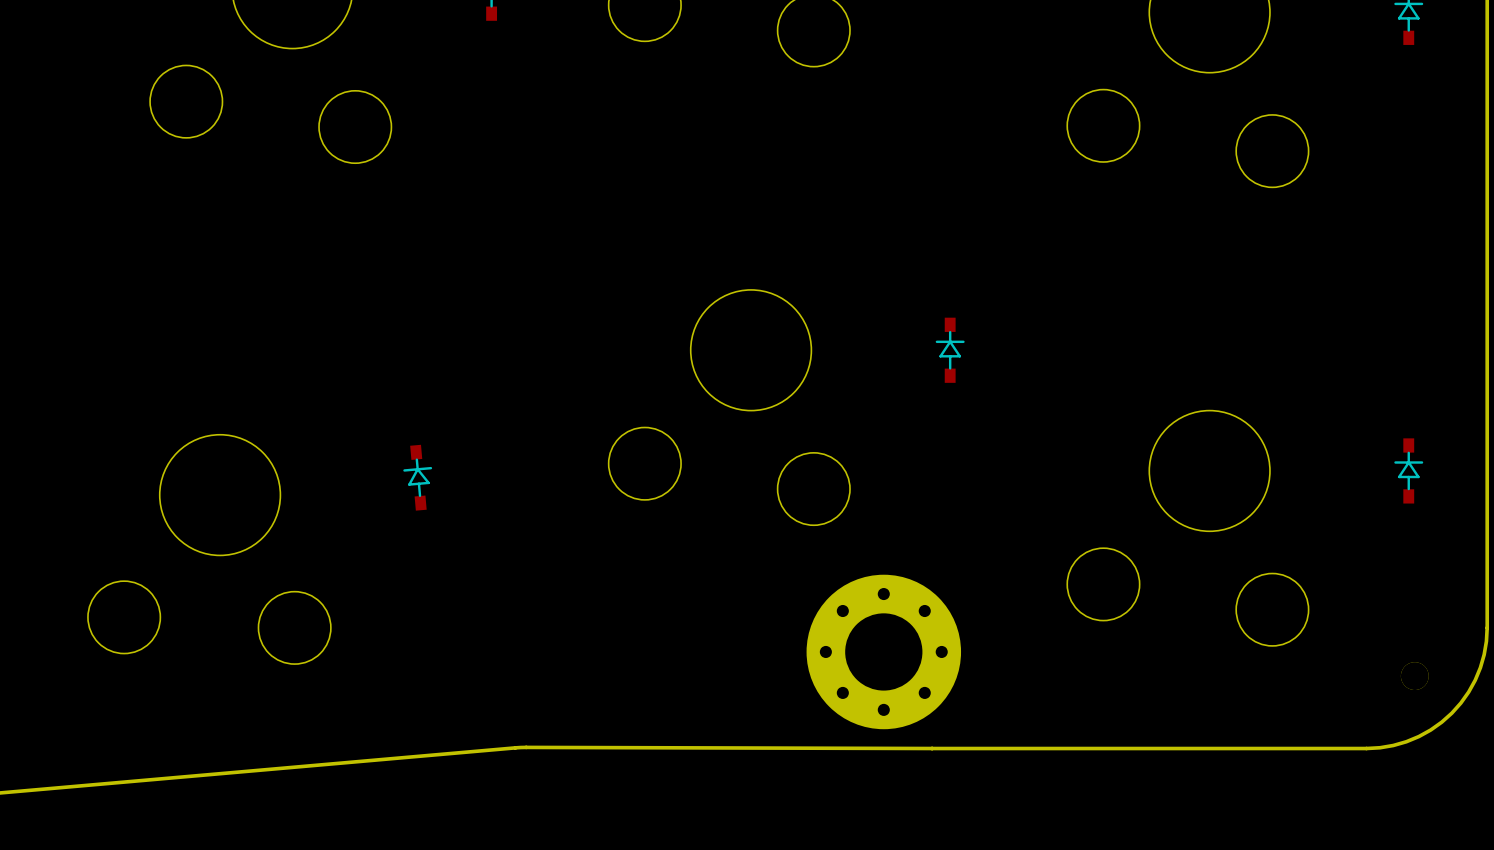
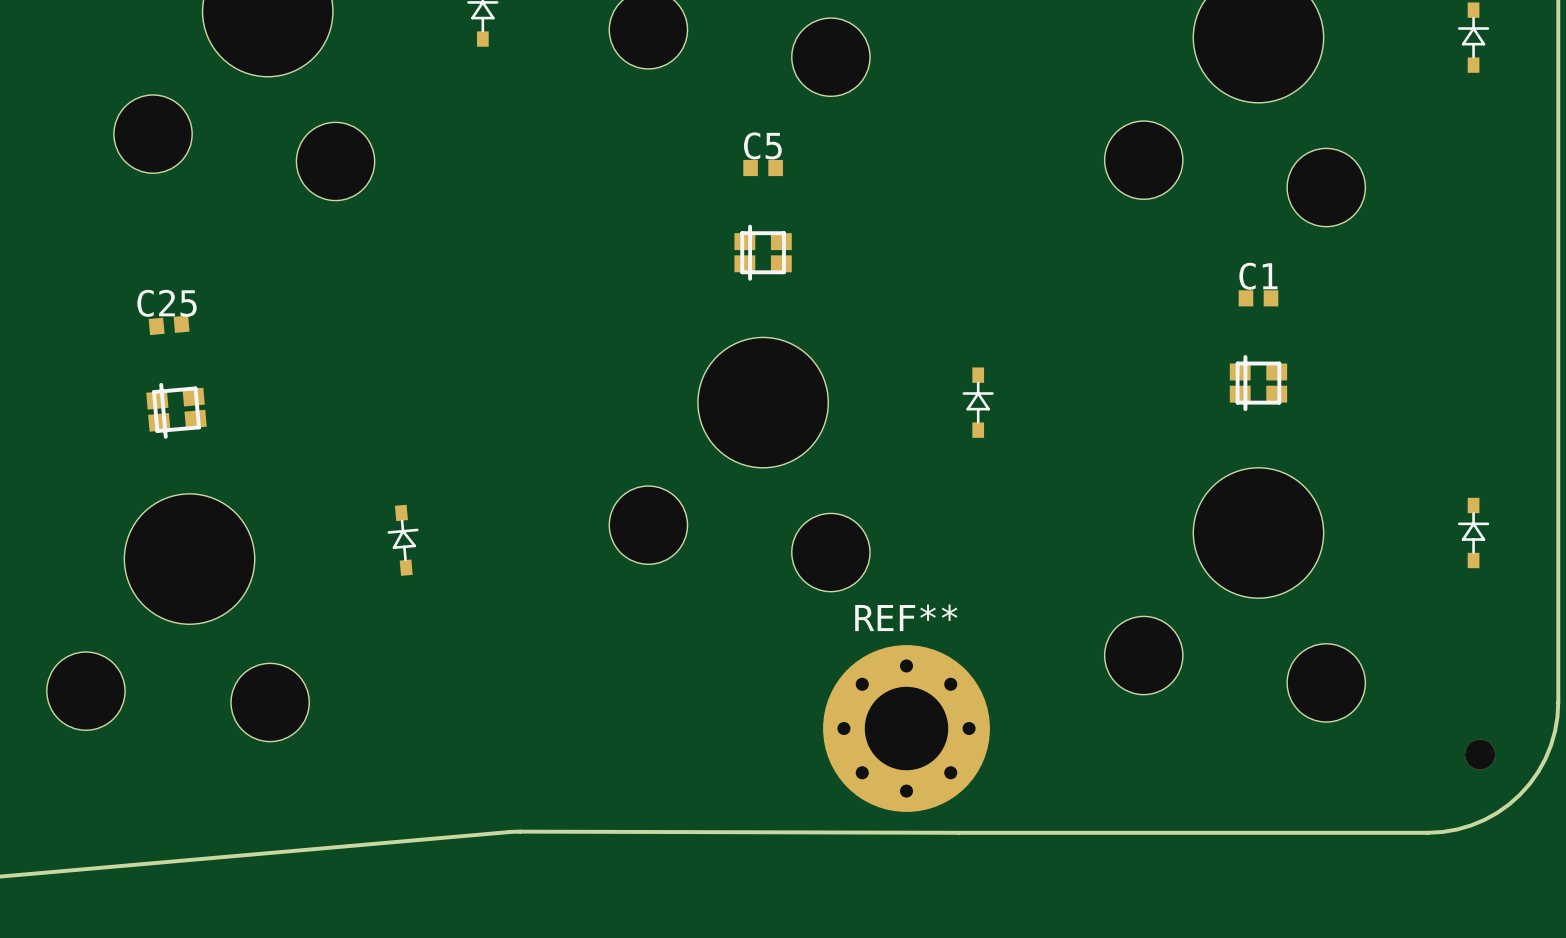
C5: none -> (763, 167)
part: none -> (763, 252)
C1: none -> (1258, 298)
C25: none -> (169, 325)
part: none -> (1258, 383)
part: none -> (176, 410)
REF** name: none -> REF** (906, 617)

